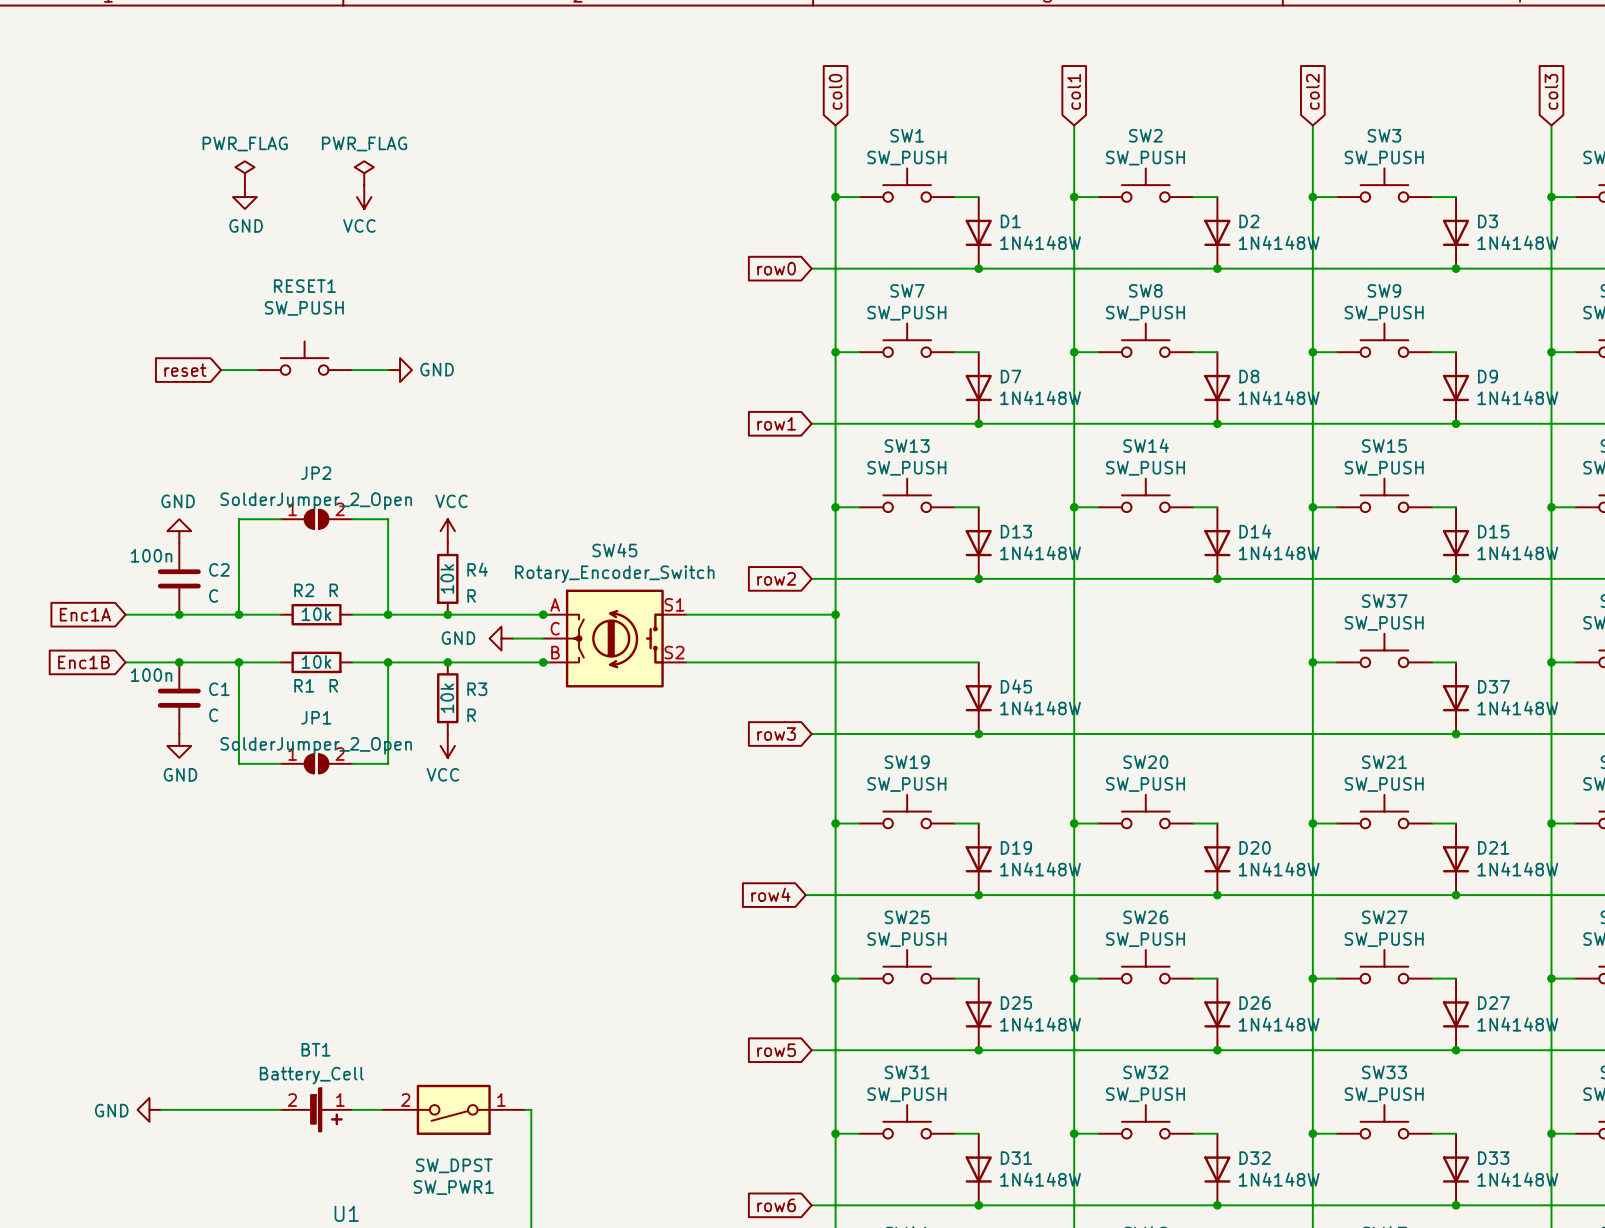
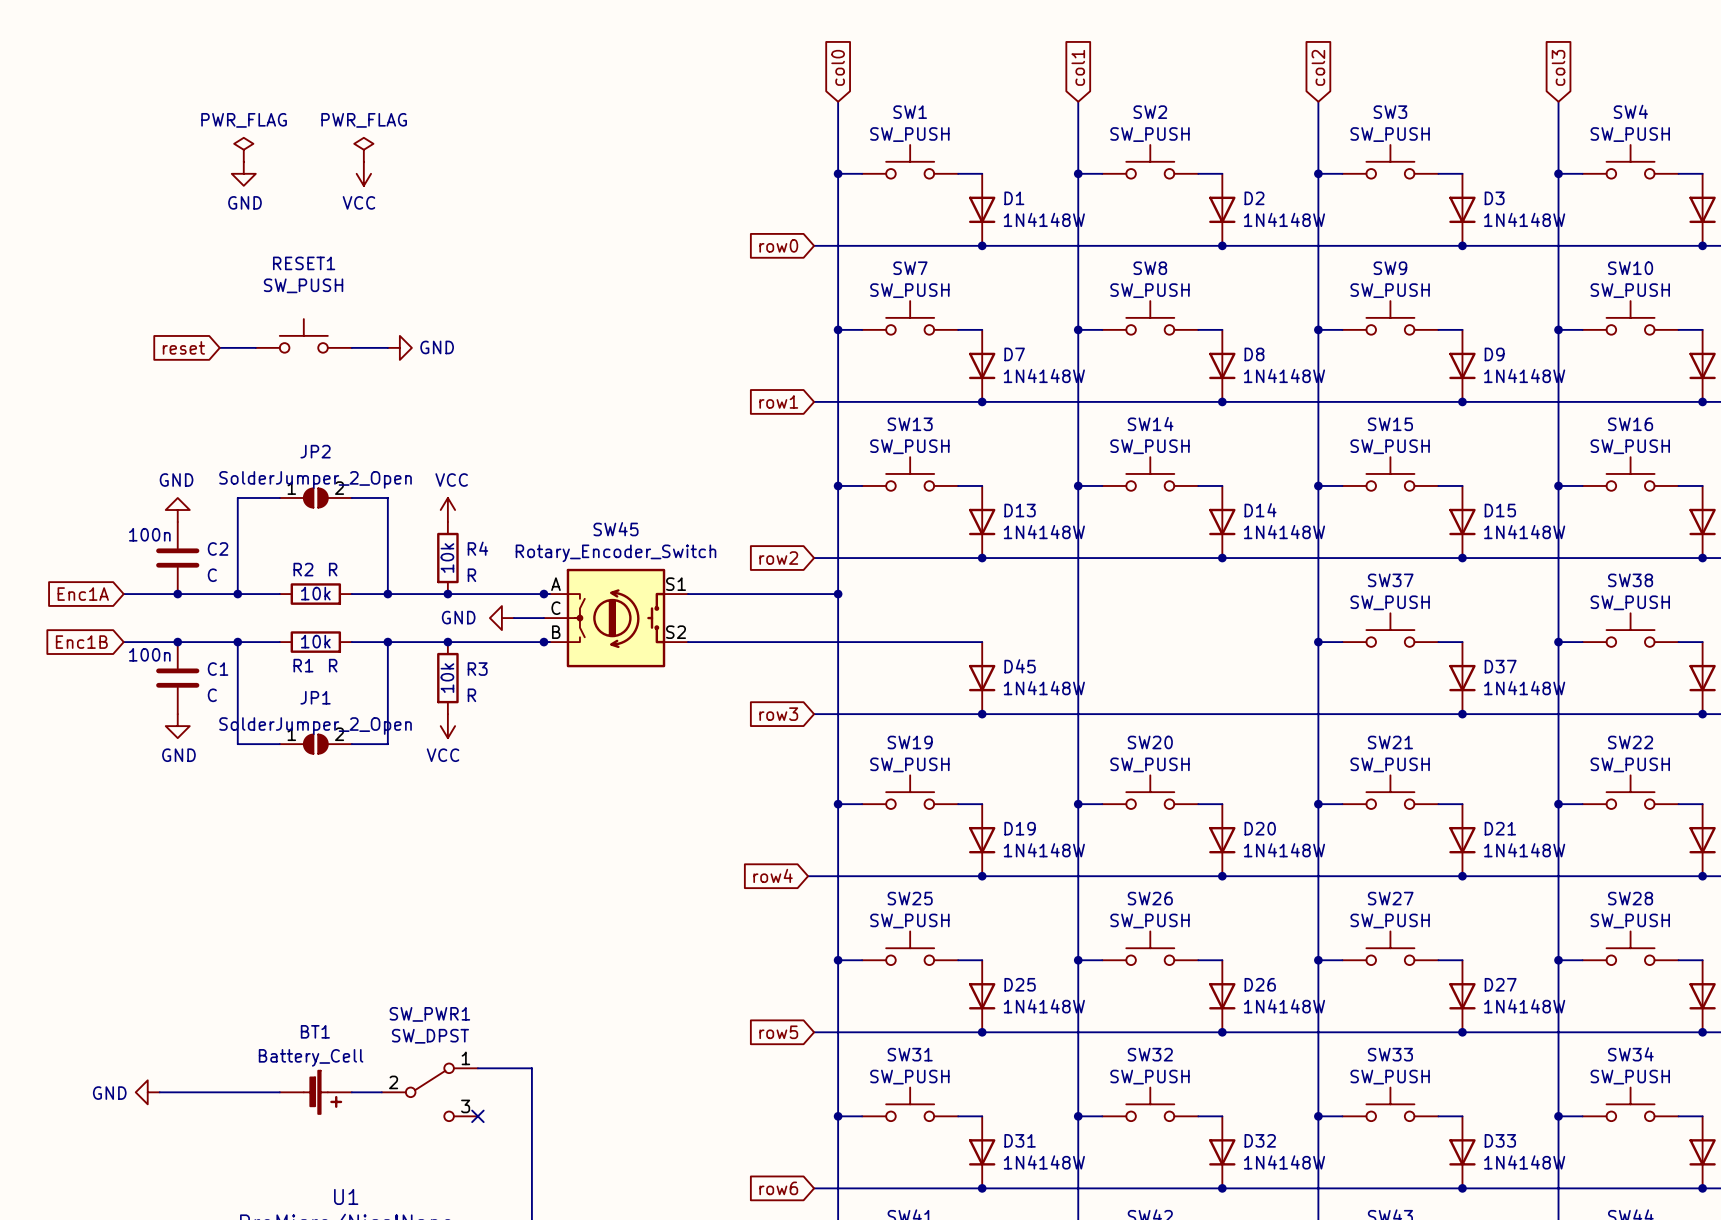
SW_PWR1 symbol: [382, 1084, 526, 1135] -> [381, 1063, 478, 1122]
BT1 pin number: 2 (292, 1100) -> none
BT1 pin number: 1 (340, 1100) -> none
wire: (525, 1109) (531, 1109) -> (477, 1068) (531, 1068) (531, 1092)
no-connect mark: none -> (477, 1116)
SW_PWR1 value position: SW_DPST (454, 1165) -> SW_DPST (430, 1036)
SW_PWR1 name position: SW_PWR1 (453, 1187) -> SW_PWR1 (429, 1014)

